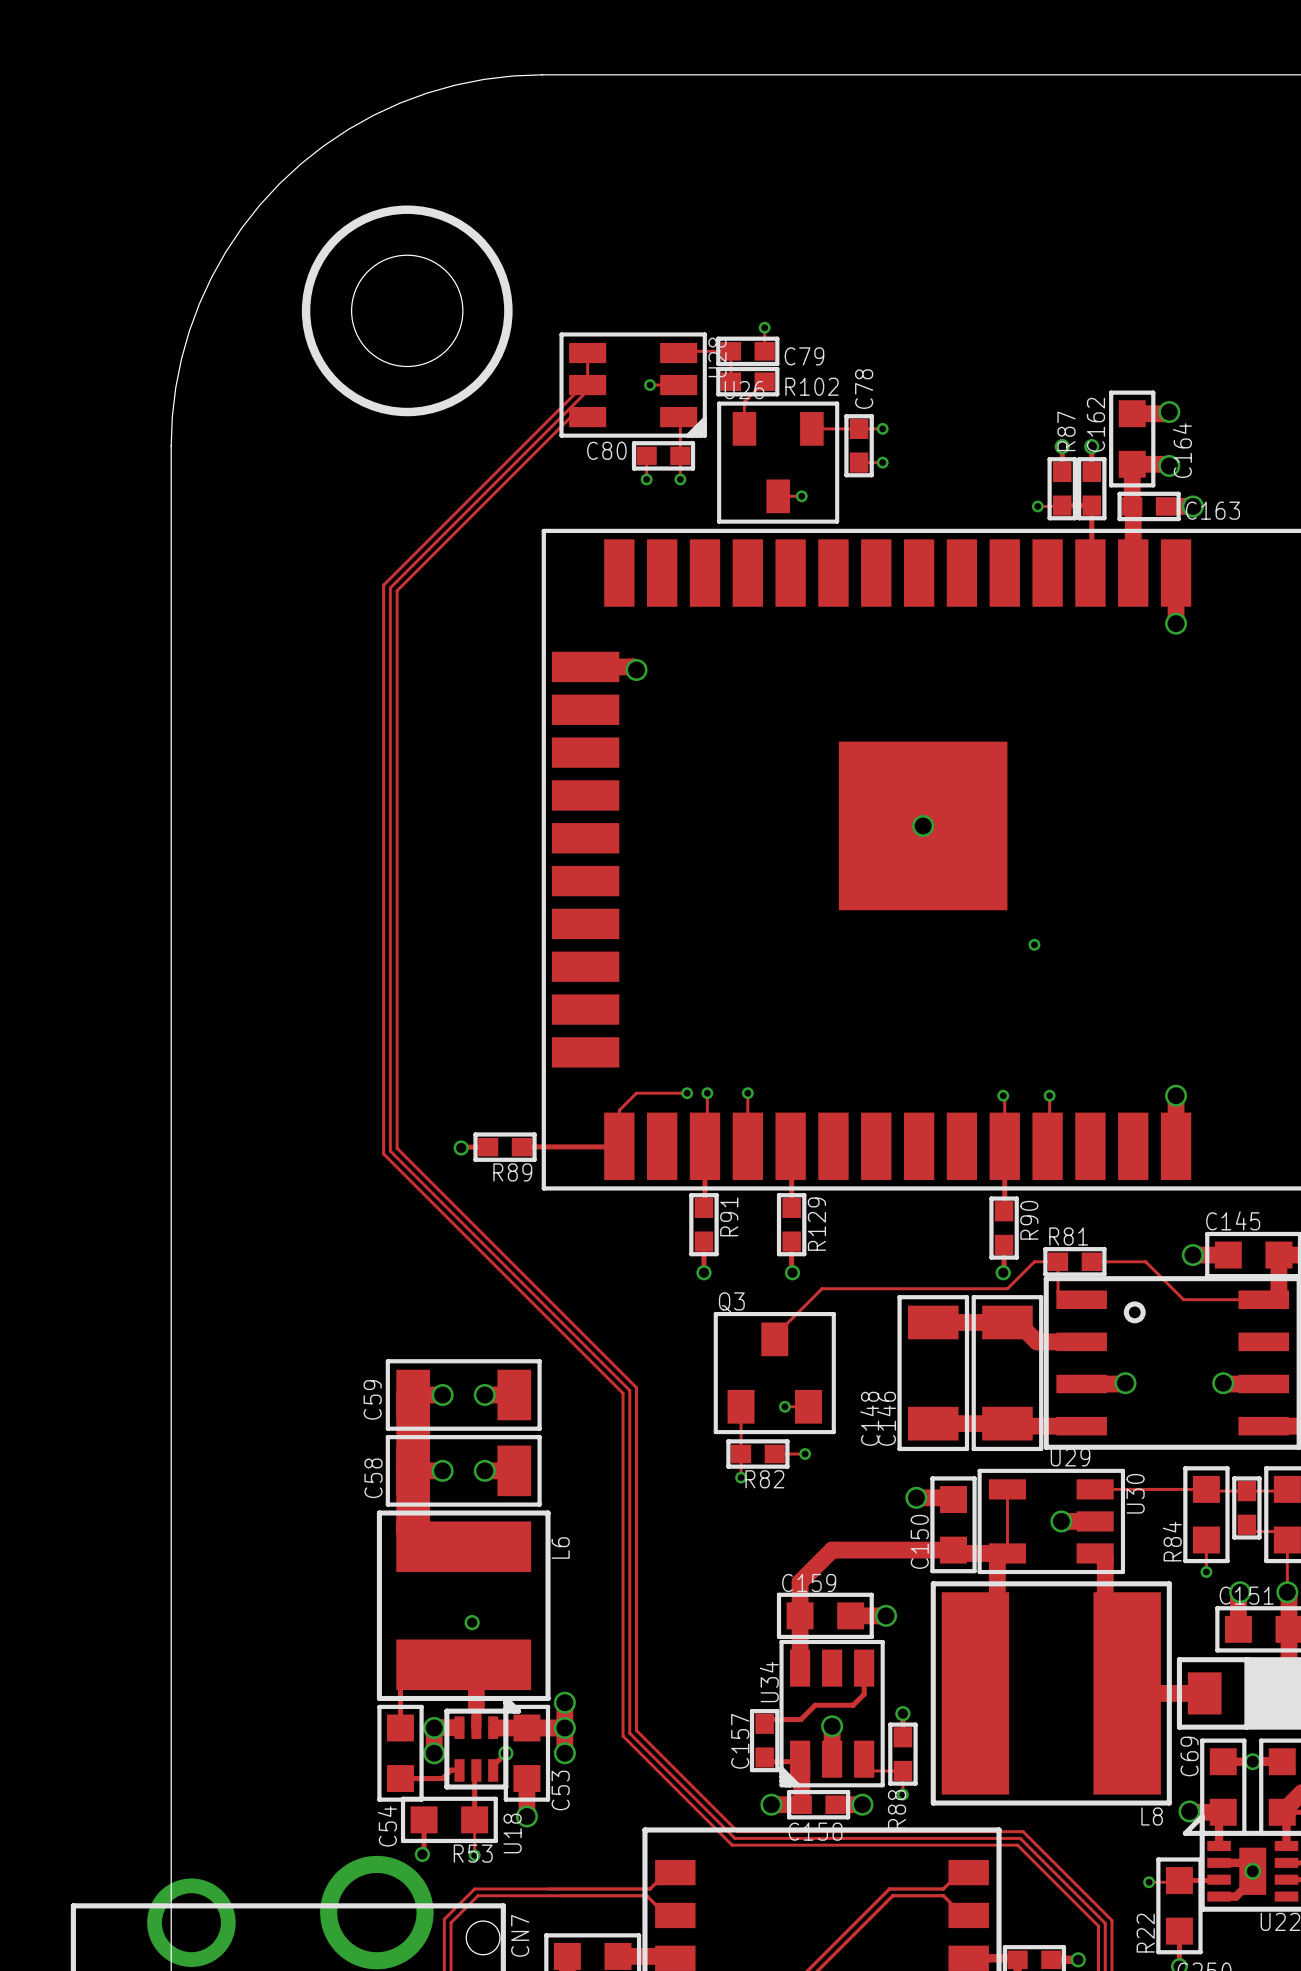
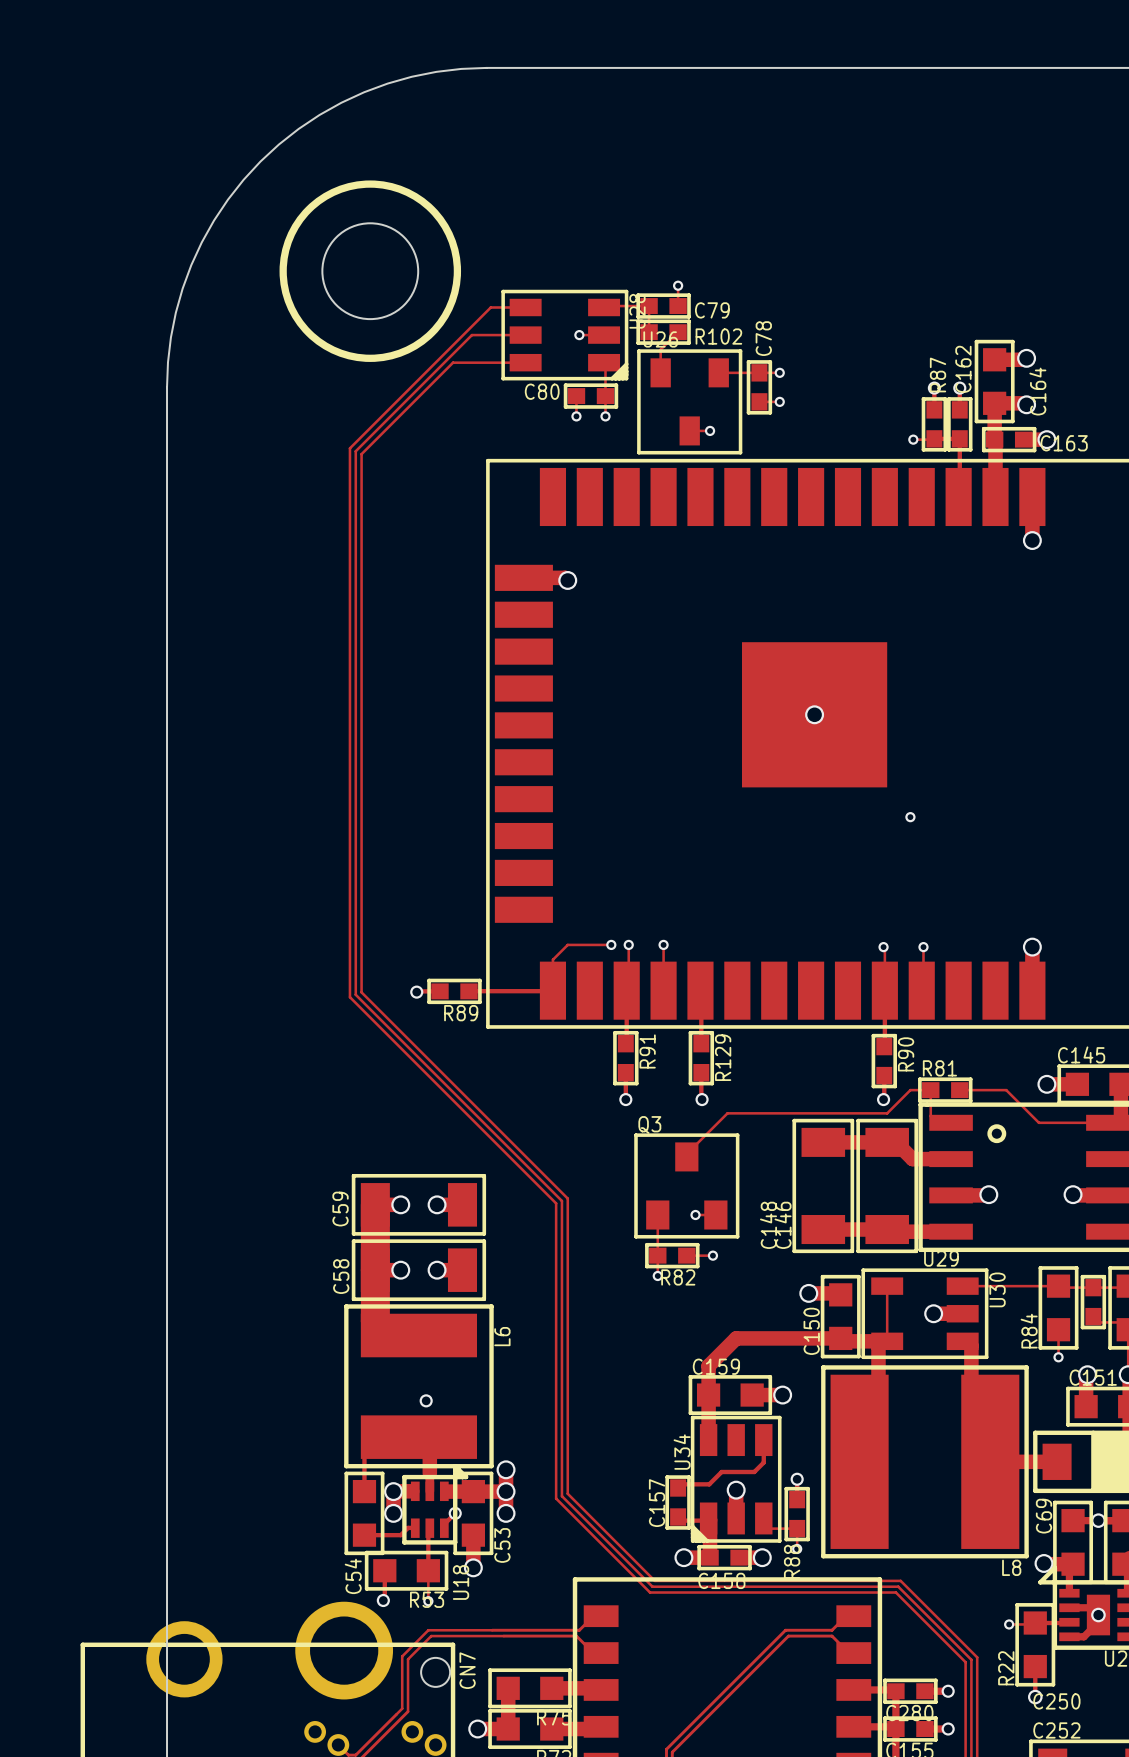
track: (587, 353) (587, 381) (383, 585) -> (525, 307) (490, 307) (349, 448) (349, 507)
track: (587, 385) (587, 390) (390, 587) -> (525, 335) (471, 335) (355, 451) (355, 509)
track: (570, 417) (397, 590) -> (511, 362) (453, 362) (361, 454) (361, 512)

